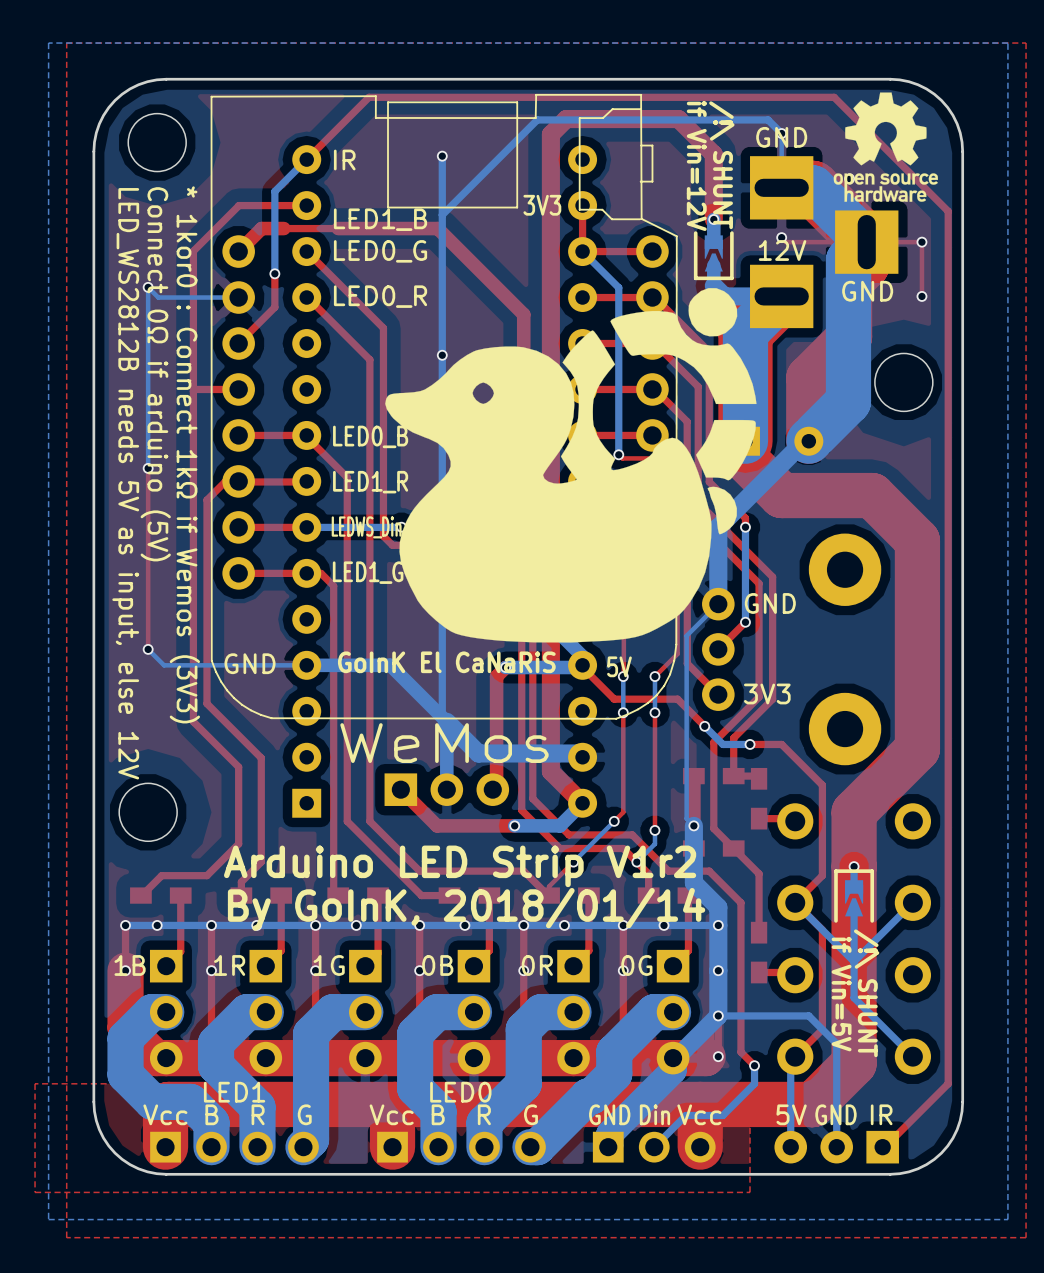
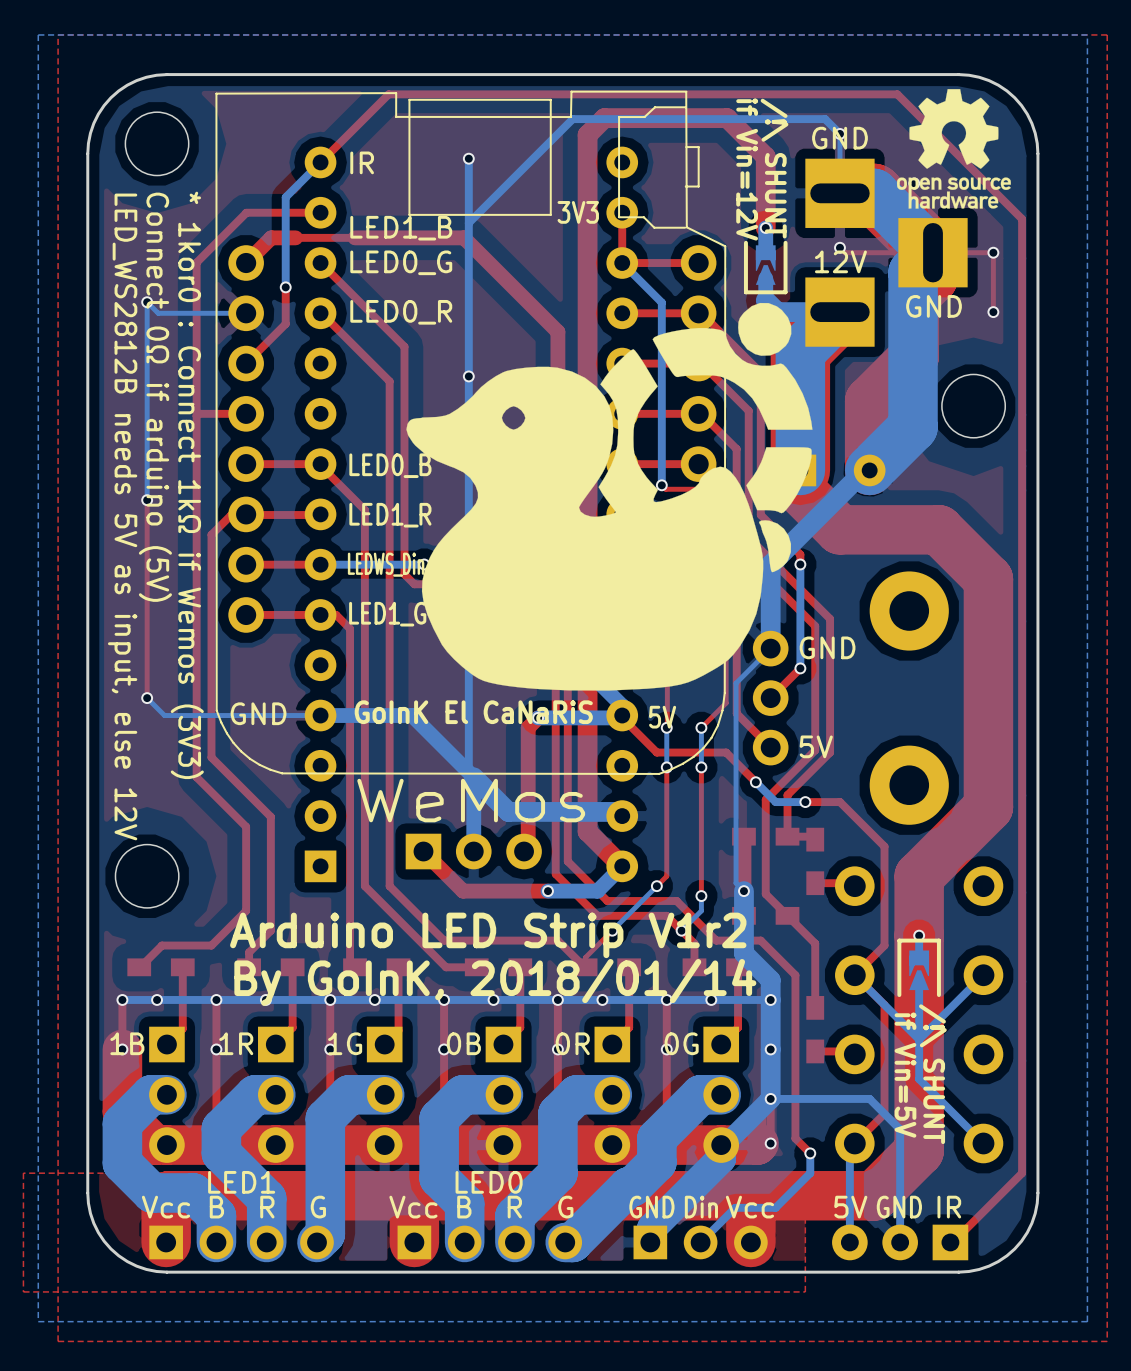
text: 3V3 (767, 693) -> 5V (816, 746)

